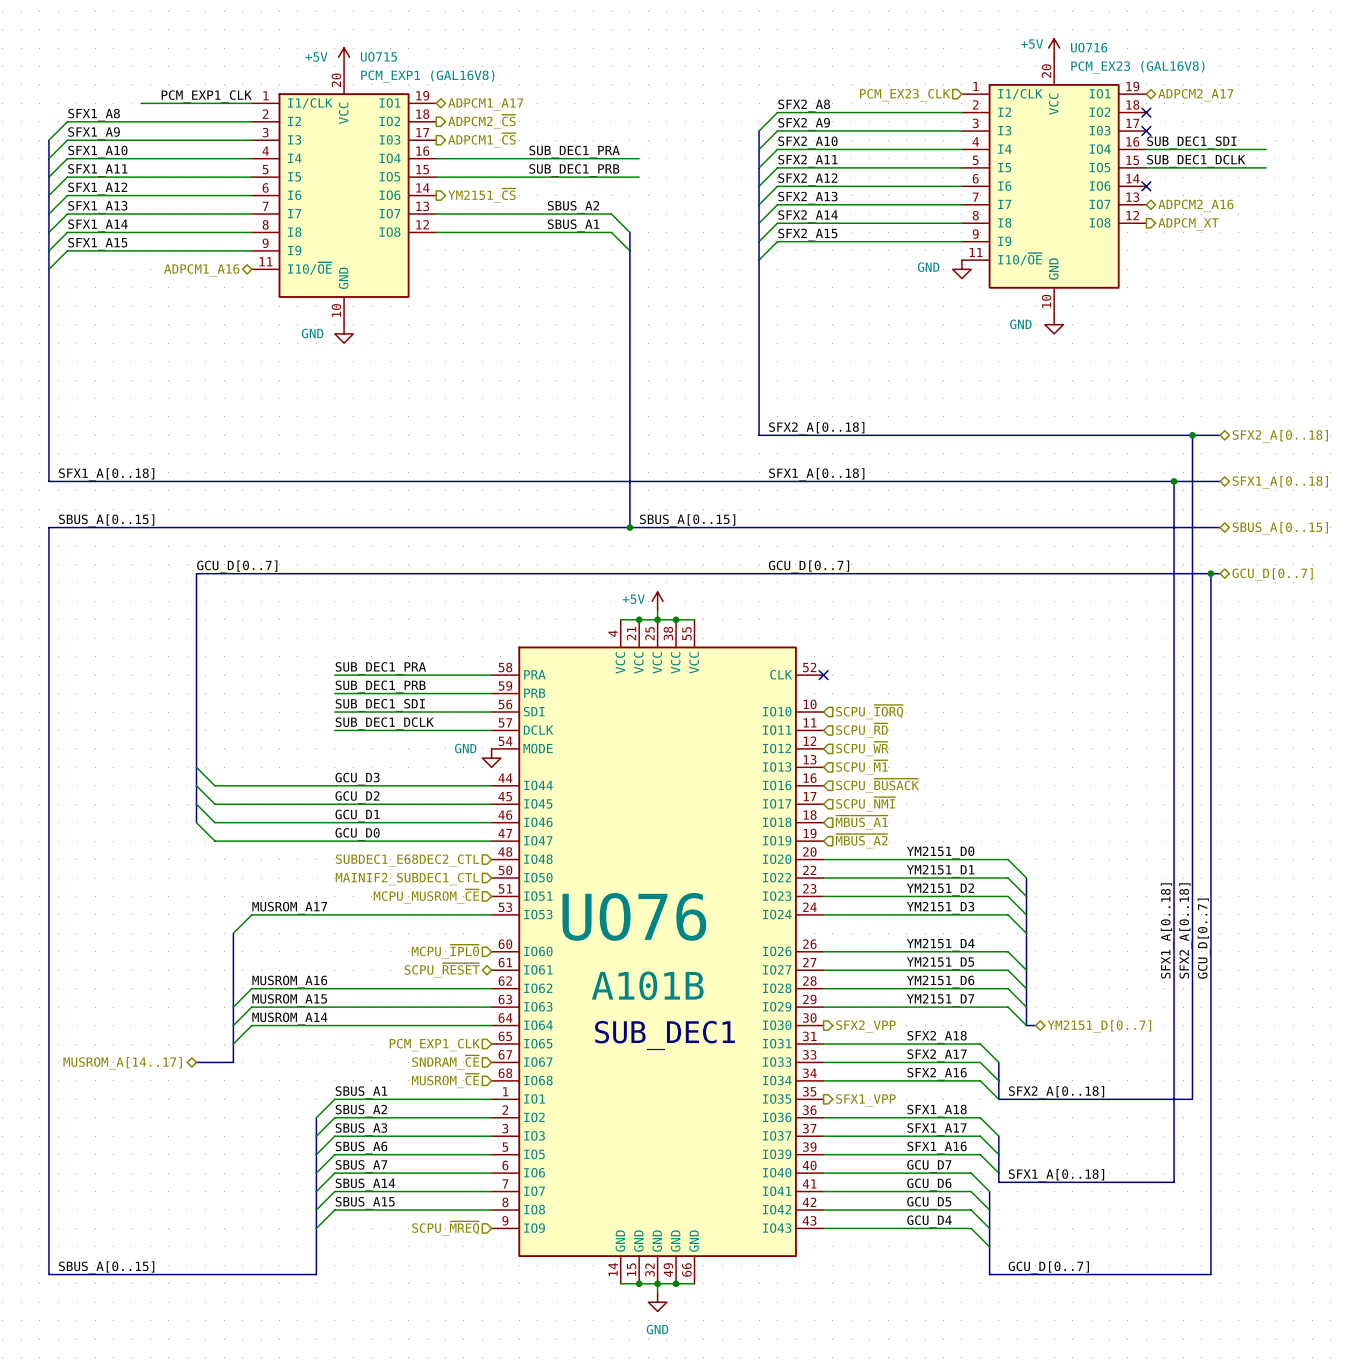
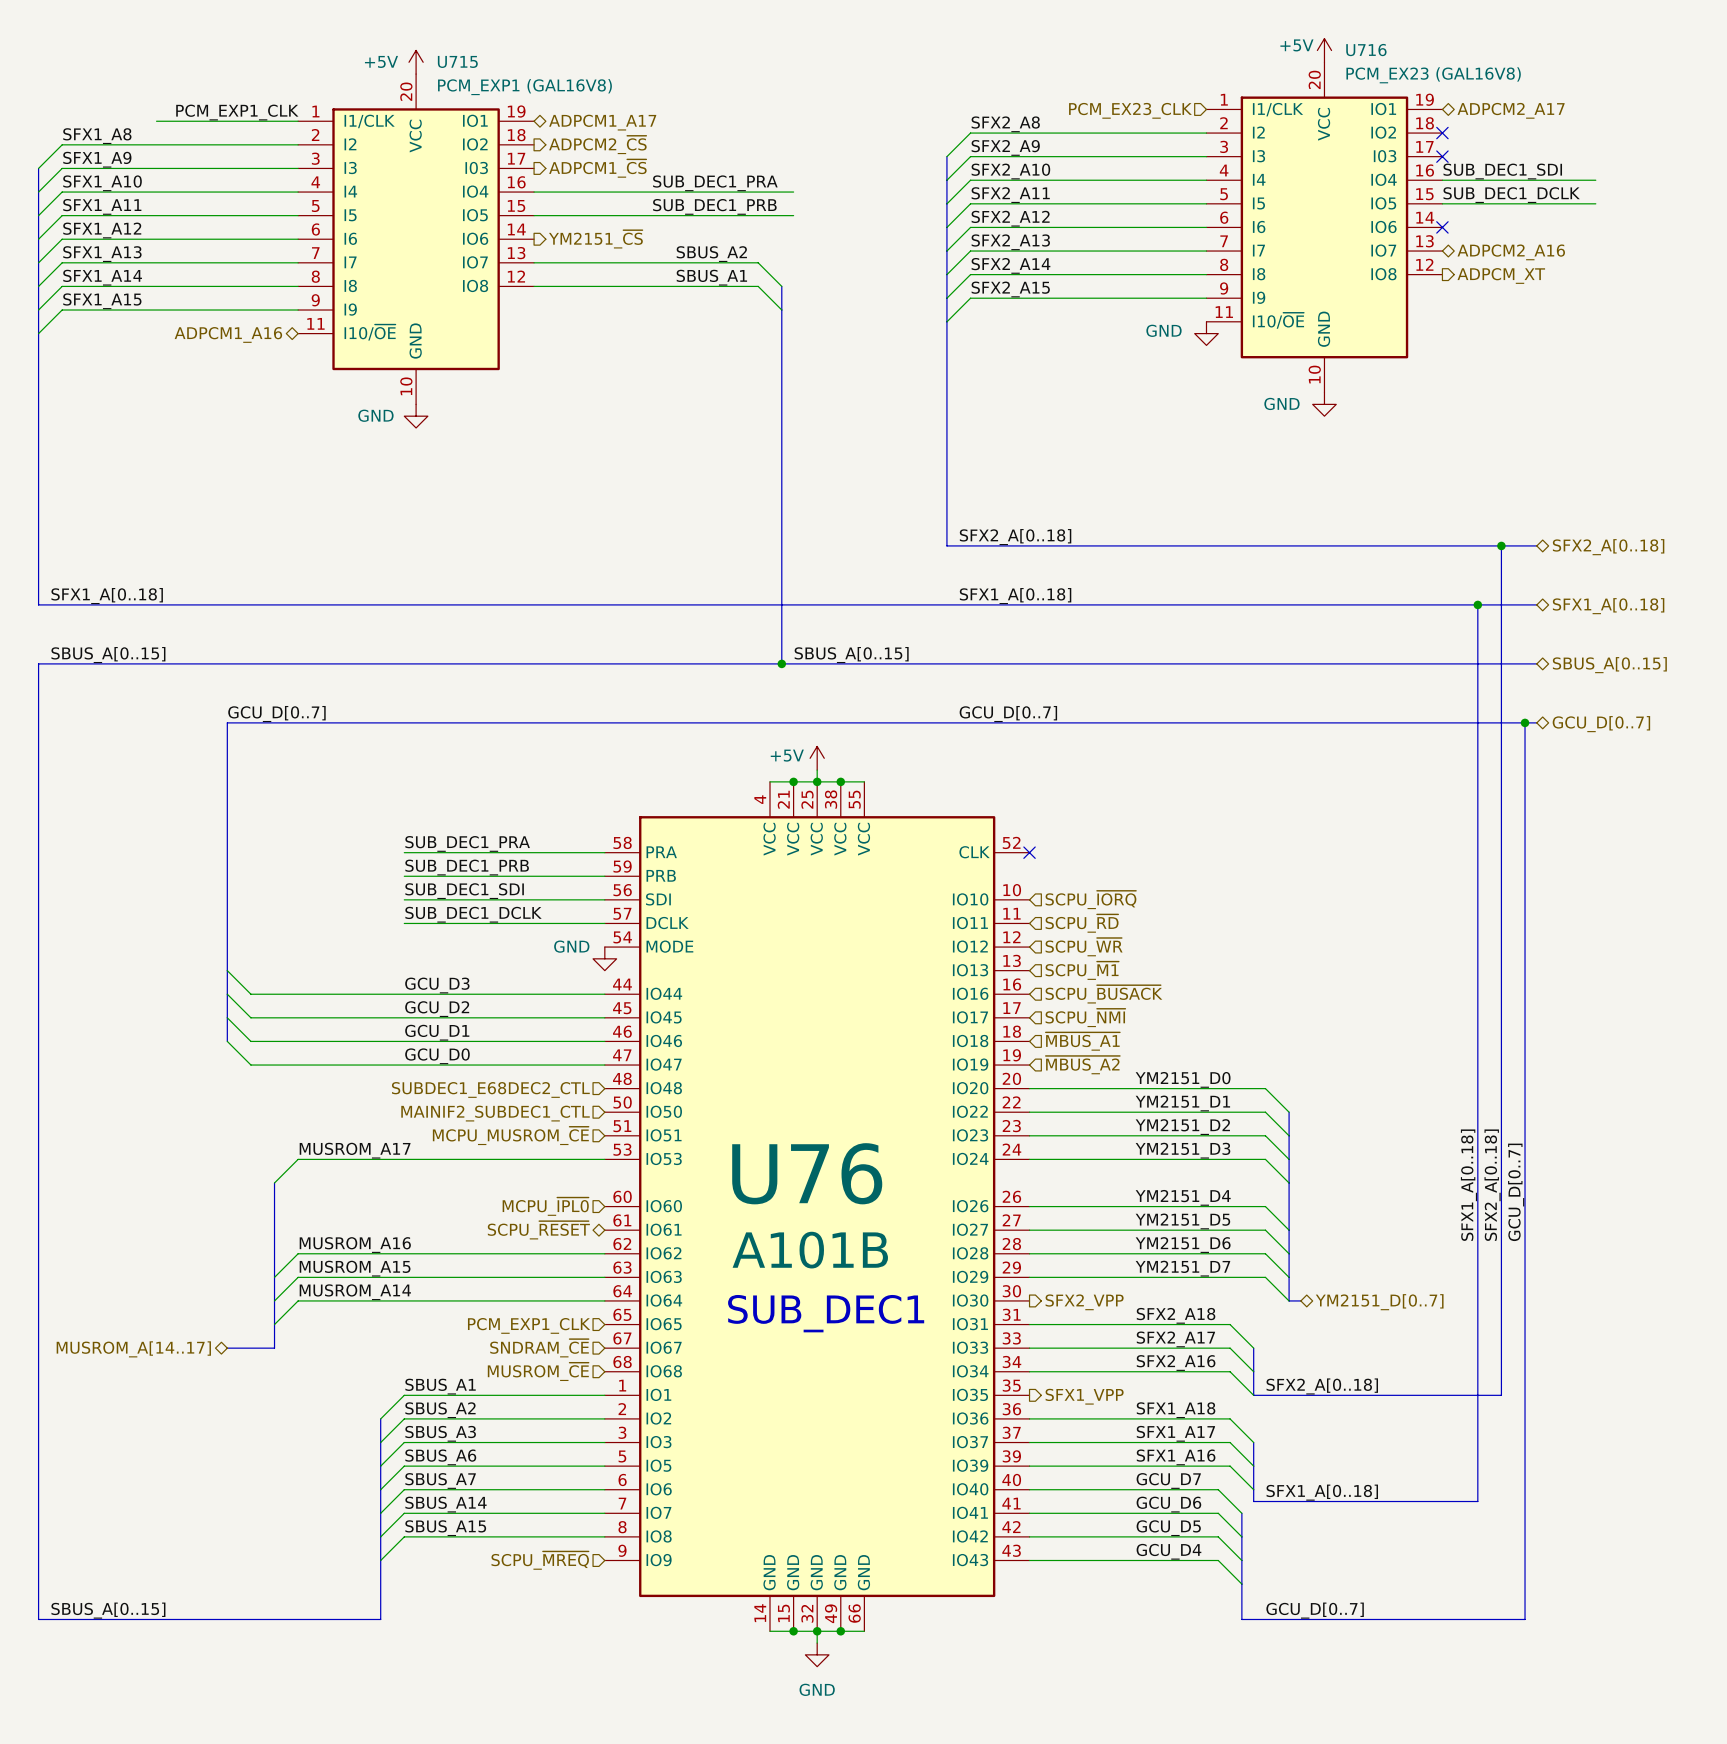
UO716 name: UO716 (1089, 47) -> U716 (1366, 50)
UO715 name: UO715 (378, 56) -> U715 (457, 61)
UO76 name: UO76 (634, 916) -> U76 (807, 1173)

